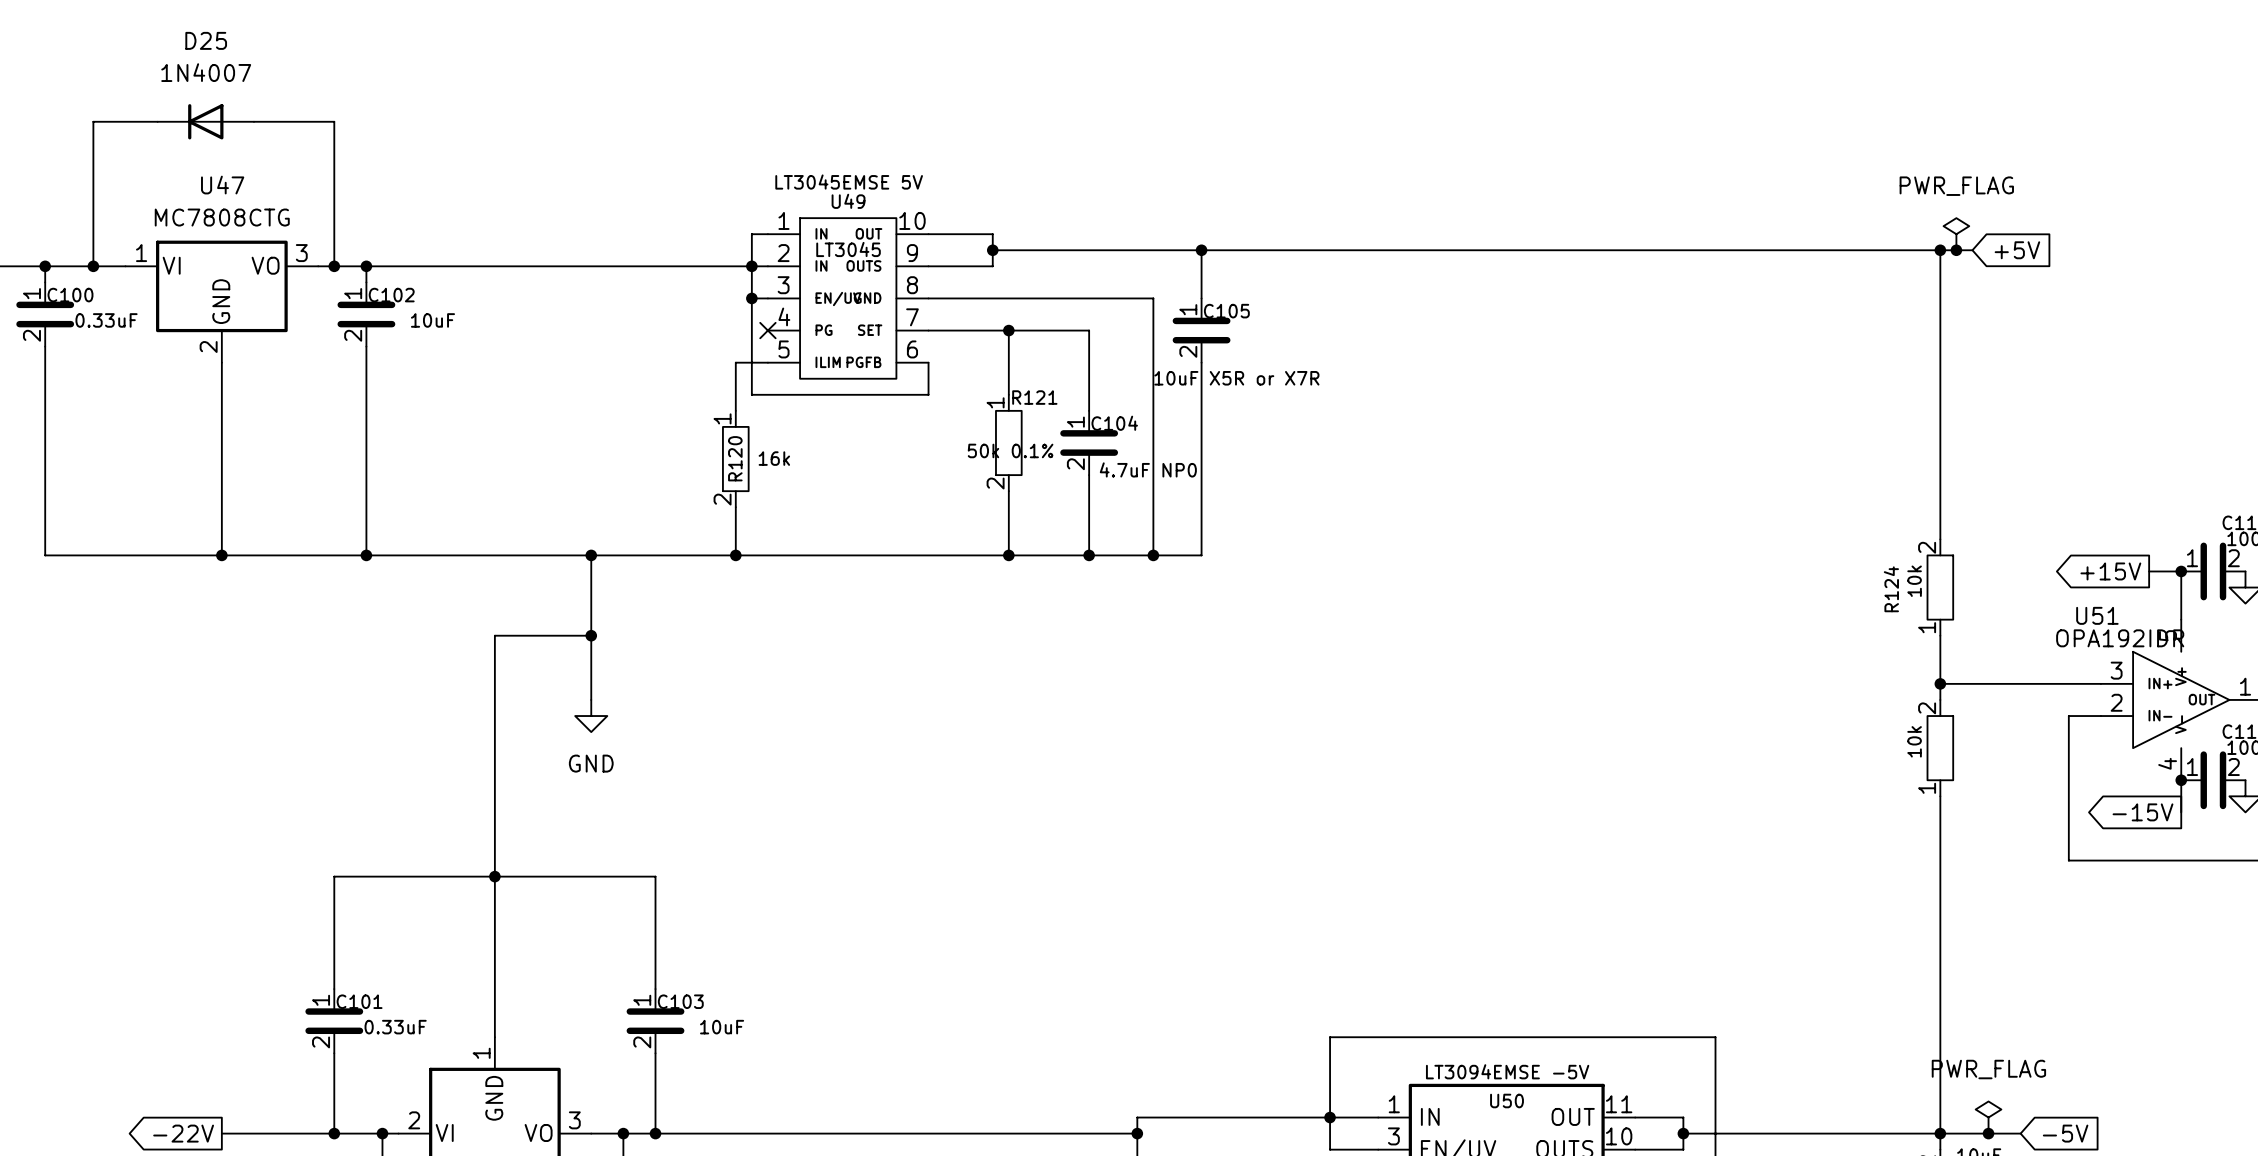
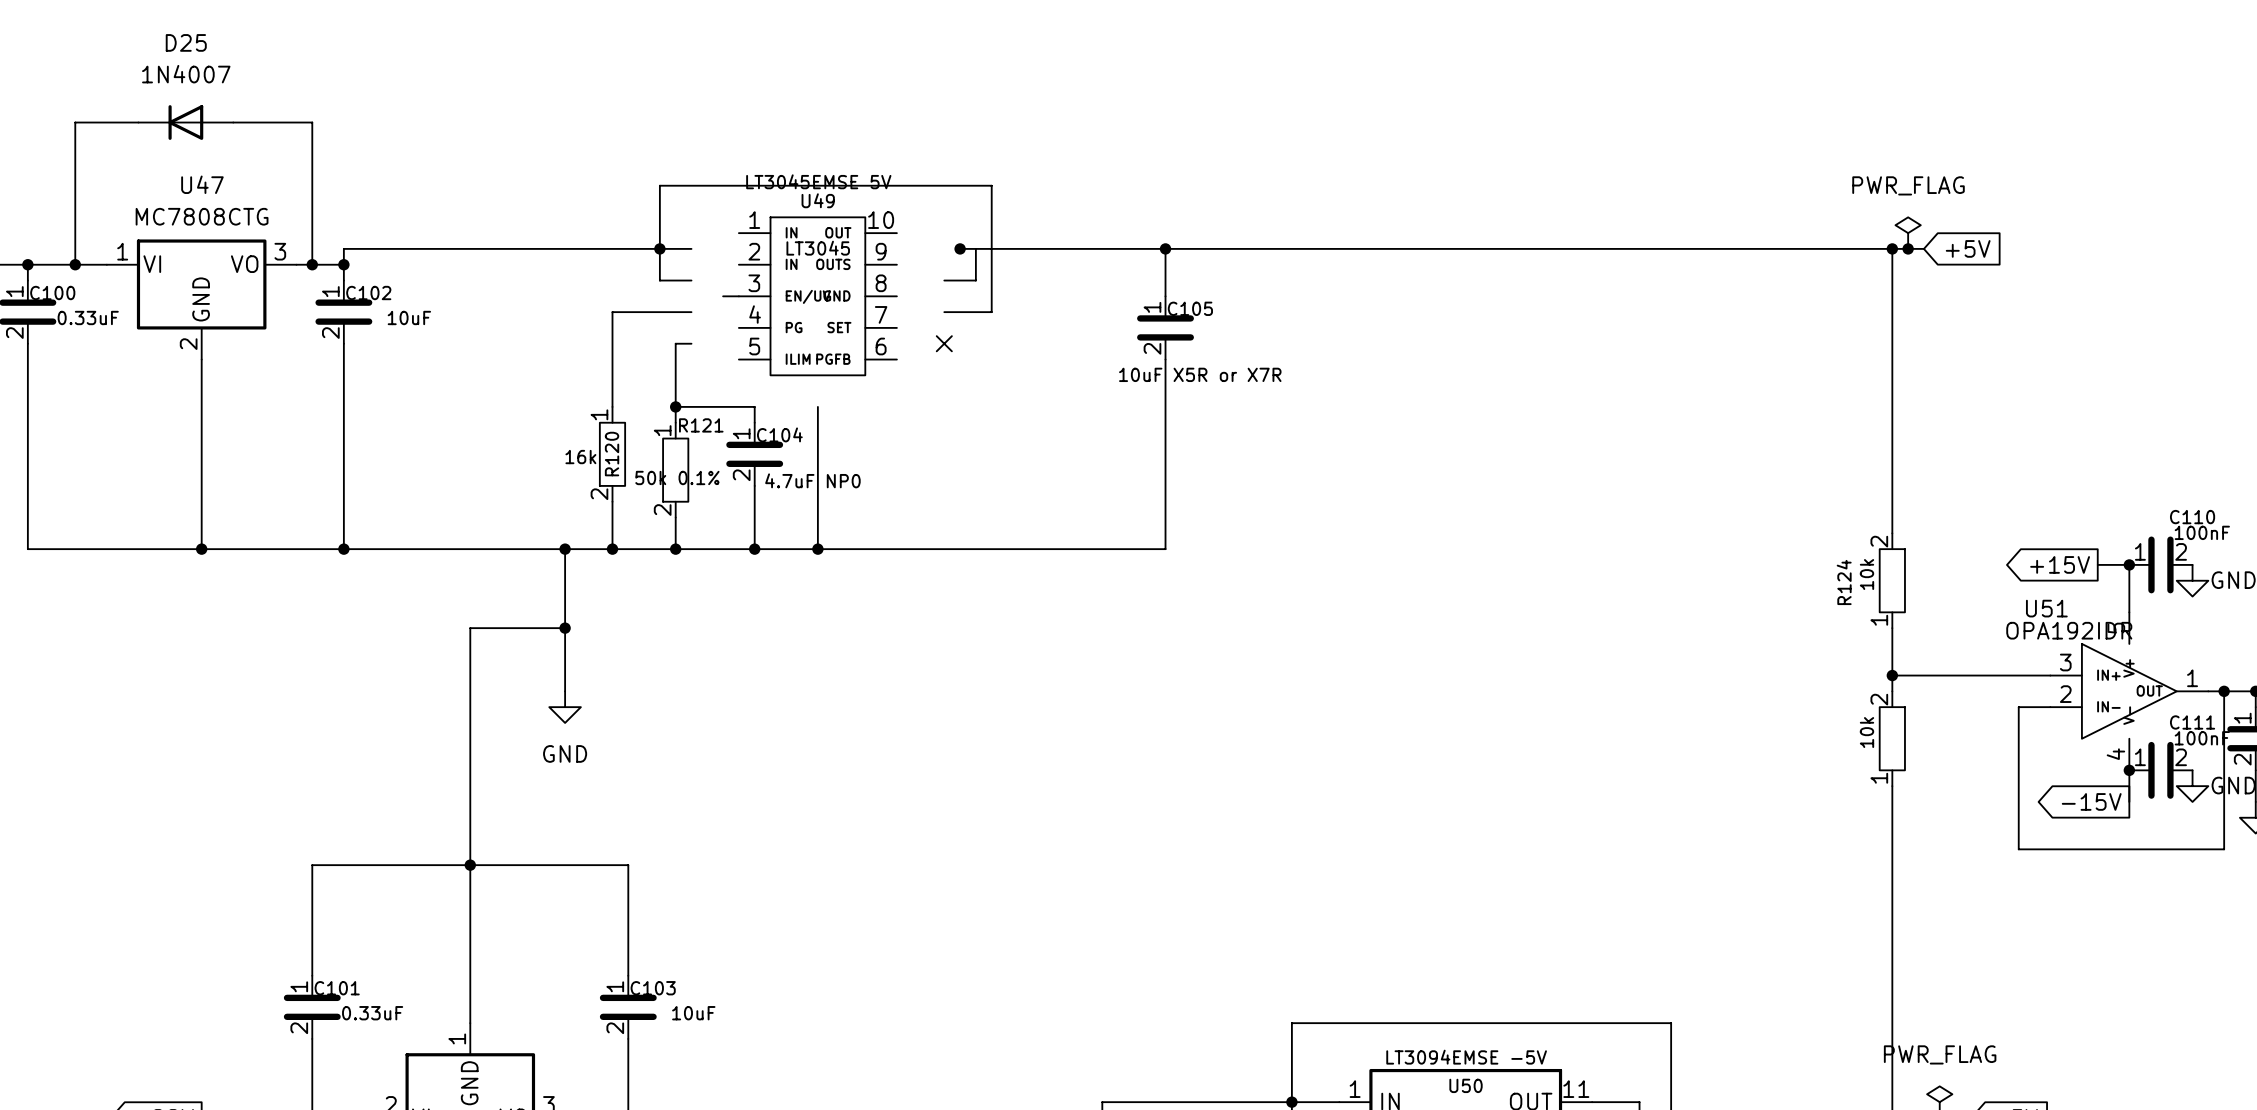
wire: (767, 234) (751, 234) (751, 394) (928, 394) (928, 362) -> none
wire: (928, 234) (992, 234) (992, 266) (928, 266) -> none
junction: none -> (659, 248)
wire: none -> (975, 248) (975, 280) (944, 280)
wire: (366, 266) (767, 266) -> (343, 264) (343, 248) (691, 248)
junction: (751, 266) -> none
wire: none -> (691, 280) (659, 280) (659, 185) (991, 185) (991, 312) (944, 312)
junction: (751, 298) -> none
wire: (928, 298) (1153, 298) (1153, 555) -> none
wire: none -> (691, 312) (612, 312) (612, 406)
no-connect mark: (767, 330) -> none
wire: (928, 330) (1089, 330) (1089, 410) -> none
wire: (1008, 330) (1008, 394) -> none
junction: (1008, 330) -> none
wire: none -> (691, 343) (675, 343) (675, 422)
no-connect mark: none -> (944, 343)
wire: (767, 362) (735, 362) (735, 410) -> none
wire: none -> (675, 406) (754, 406) (754, 422)
junction: none -> (675, 406)
wire: none -> (817, 406) (817, 549)
R121 position: (1008, 442) -> (675, 470)
C104 position: (1089, 442) -> (754, 454)
R120 value position: 16k (774, 458) -> 16k (580, 457)
R120 position: (735, 459) -> (612, 454)
wire: (1089, 475) (1089, 555) -> none
wire: (1008, 491) (1008, 555) -> (754, 485) (754, 549)
wire: (735, 507) (735, 555) -> (612, 501) (612, 549)
wire: none -> (675, 517) (675, 549)
junction: none -> (612, 549)
junction: none -> (675, 549)
junction: (735, 555) -> none
junction: none -> (754, 549)
junction: none -> (817, 549)
junction: (1008, 555) -> none
junction: (1089, 555) -> none
junction: (1153, 555) -> none

